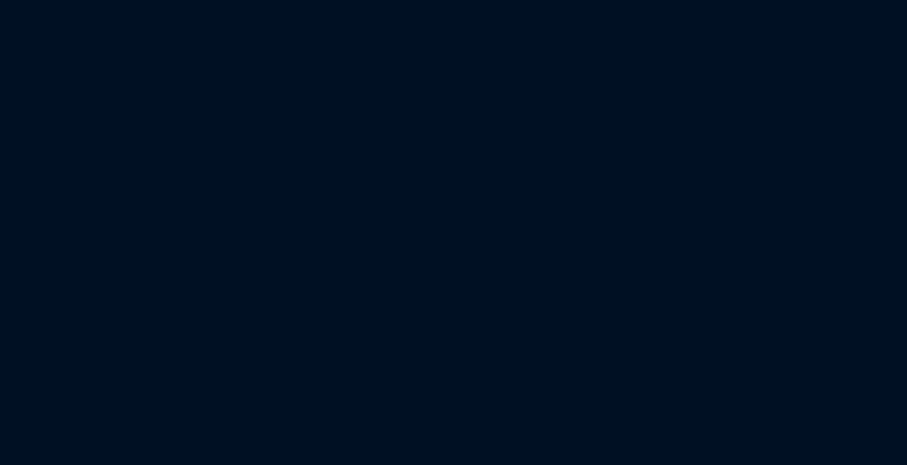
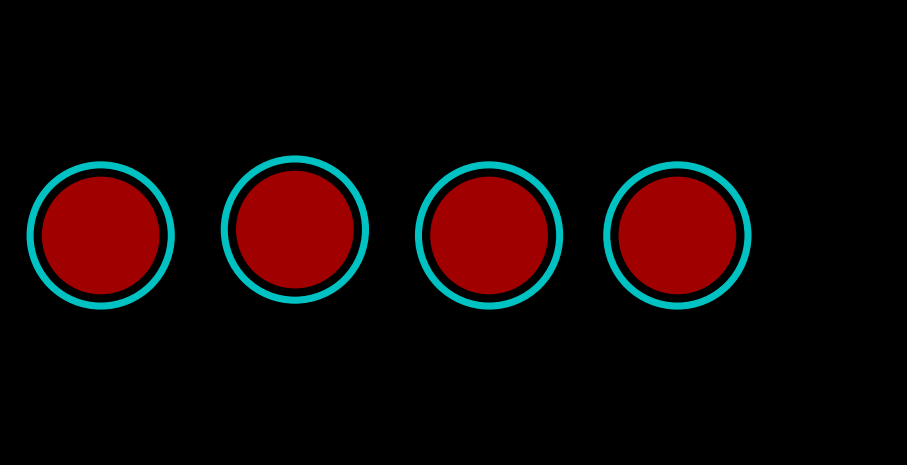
part: none -> (294, 229)
part: none -> (100, 235)
part: none -> (489, 235)
part: none -> (677, 235)

